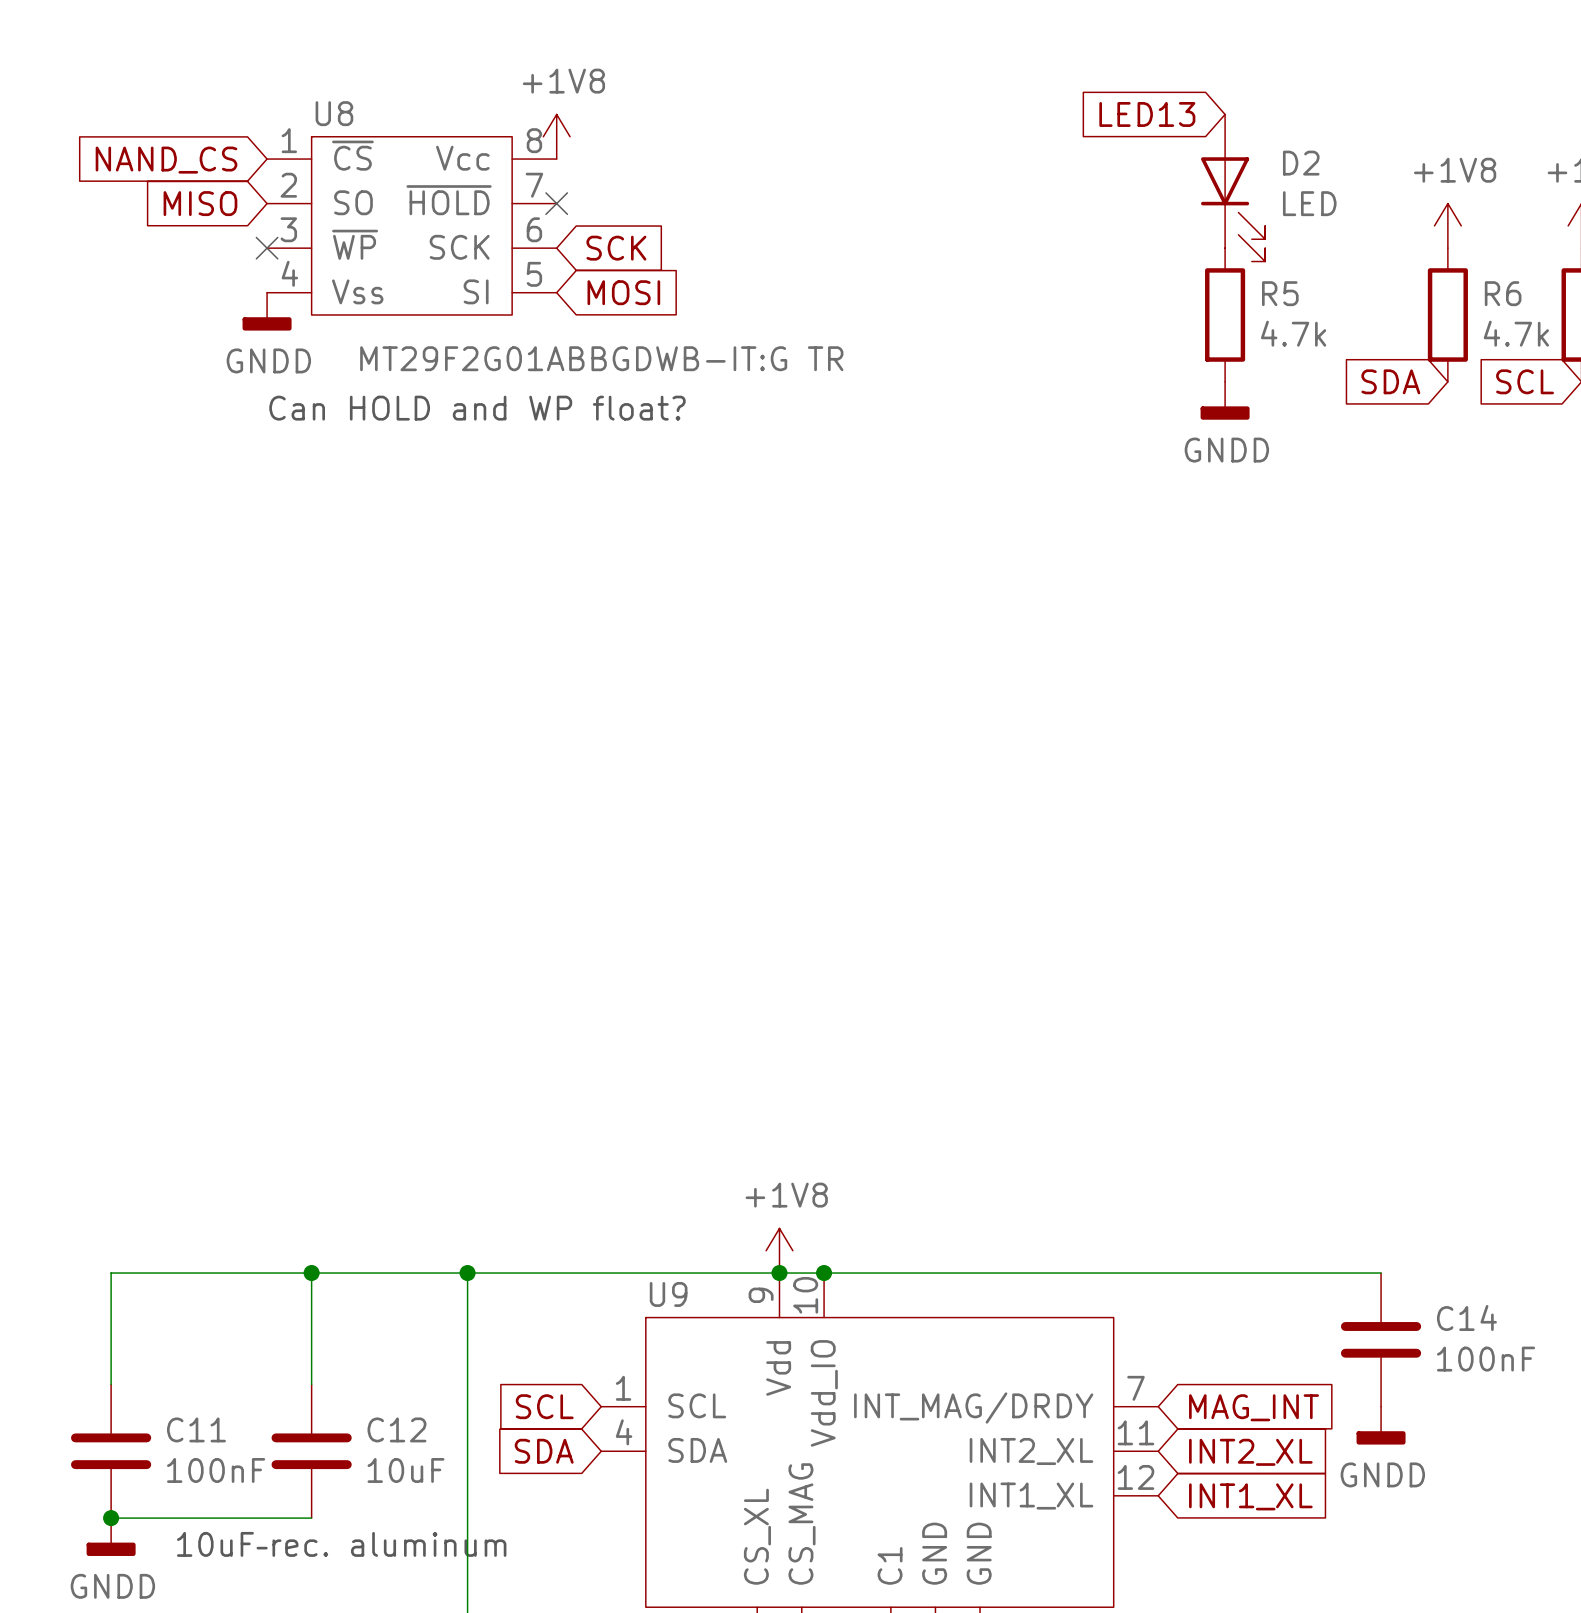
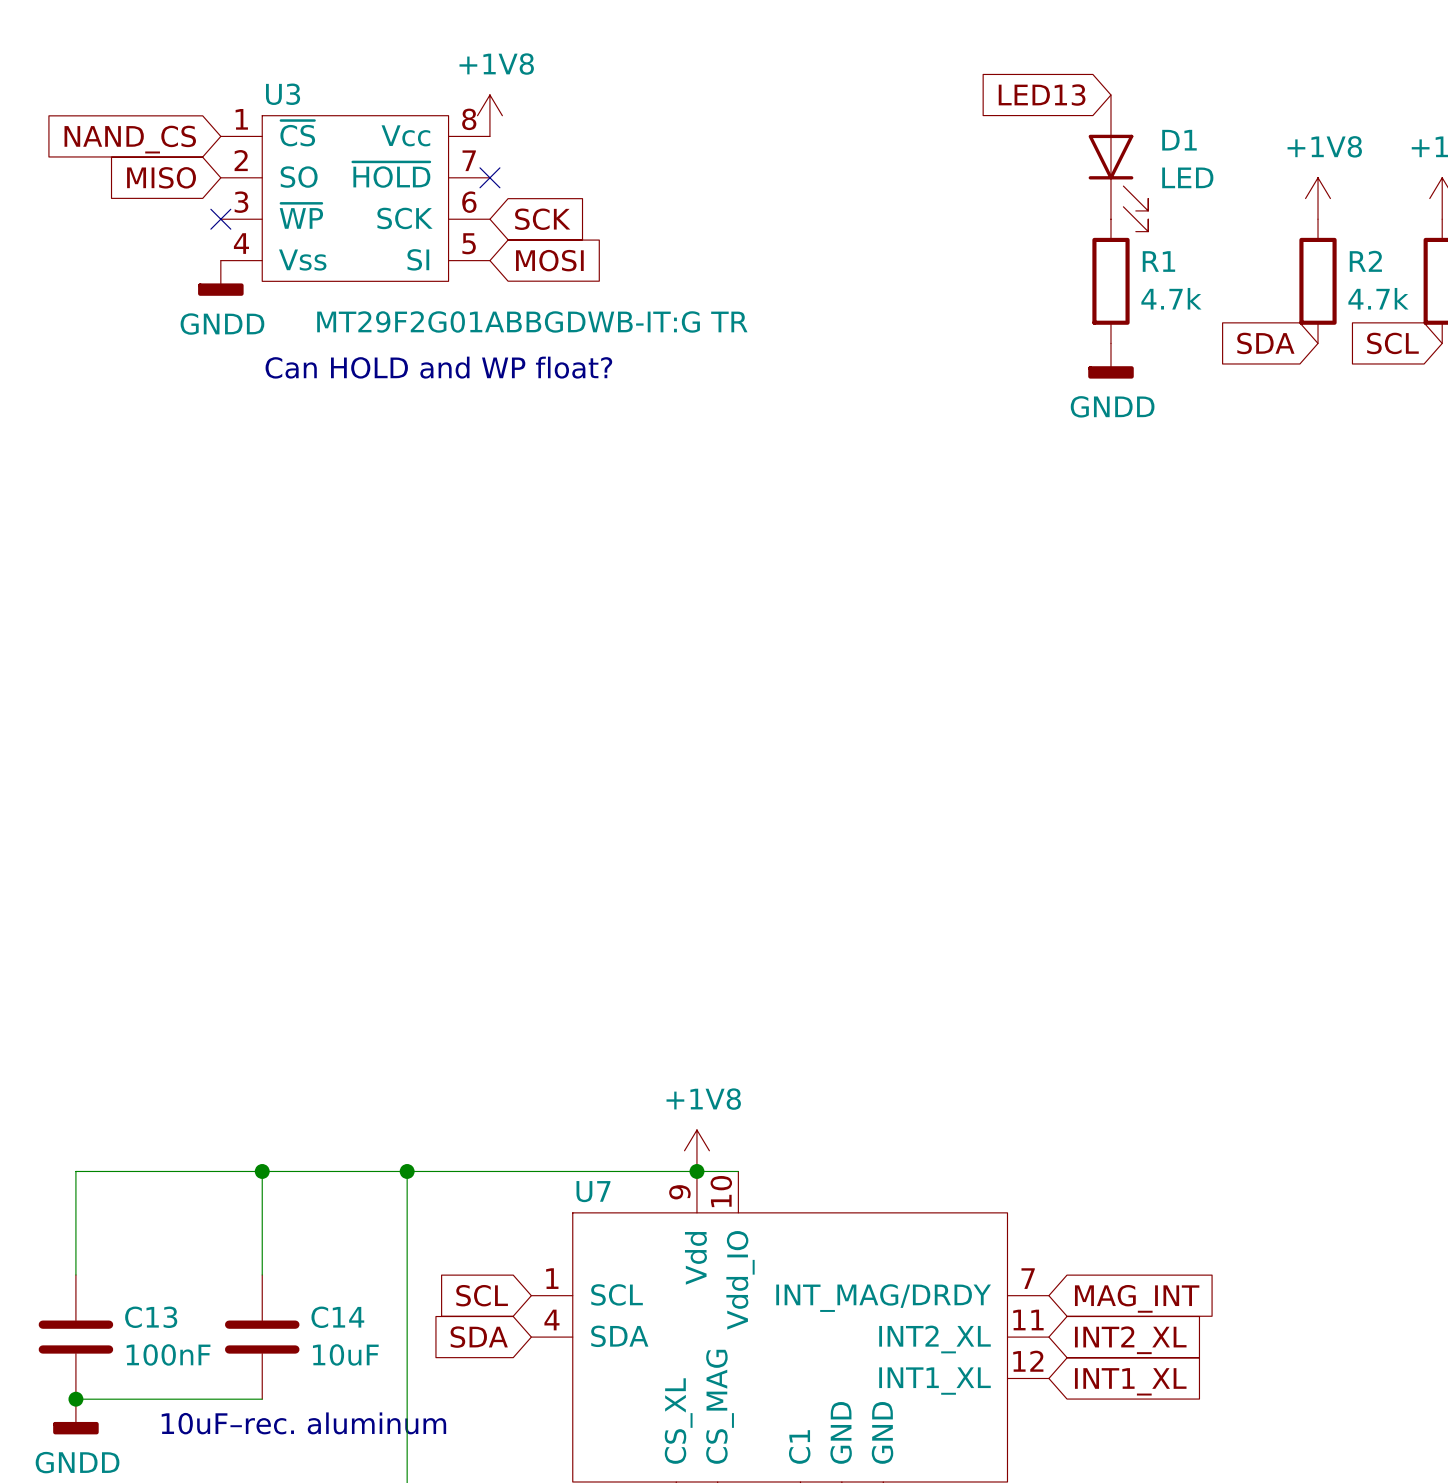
U8 name: U8 (334, 113) -> U3 (283, 94)
D2 name: D2 (1301, 163) -> D1 (1179, 140)
R5 name: R5 (1280, 293) -> R1 (1158, 261)
R6 name: R6 (1503, 293) -> R2 (1365, 261)
wire: (824, 1273) (1381, 1273) -> none
junction: (824, 1273) -> none
U9 name: U9 (668, 1294) -> U7 (593, 1191)
C14: 100nF (1381, 1339) -> none
power symbol: GNDD (1381, 1425) -> none
C11 name: C11 (196, 1429) -> C13 (151, 1317)
C12 name: C12 (396, 1429) -> C14 (337, 1317)

